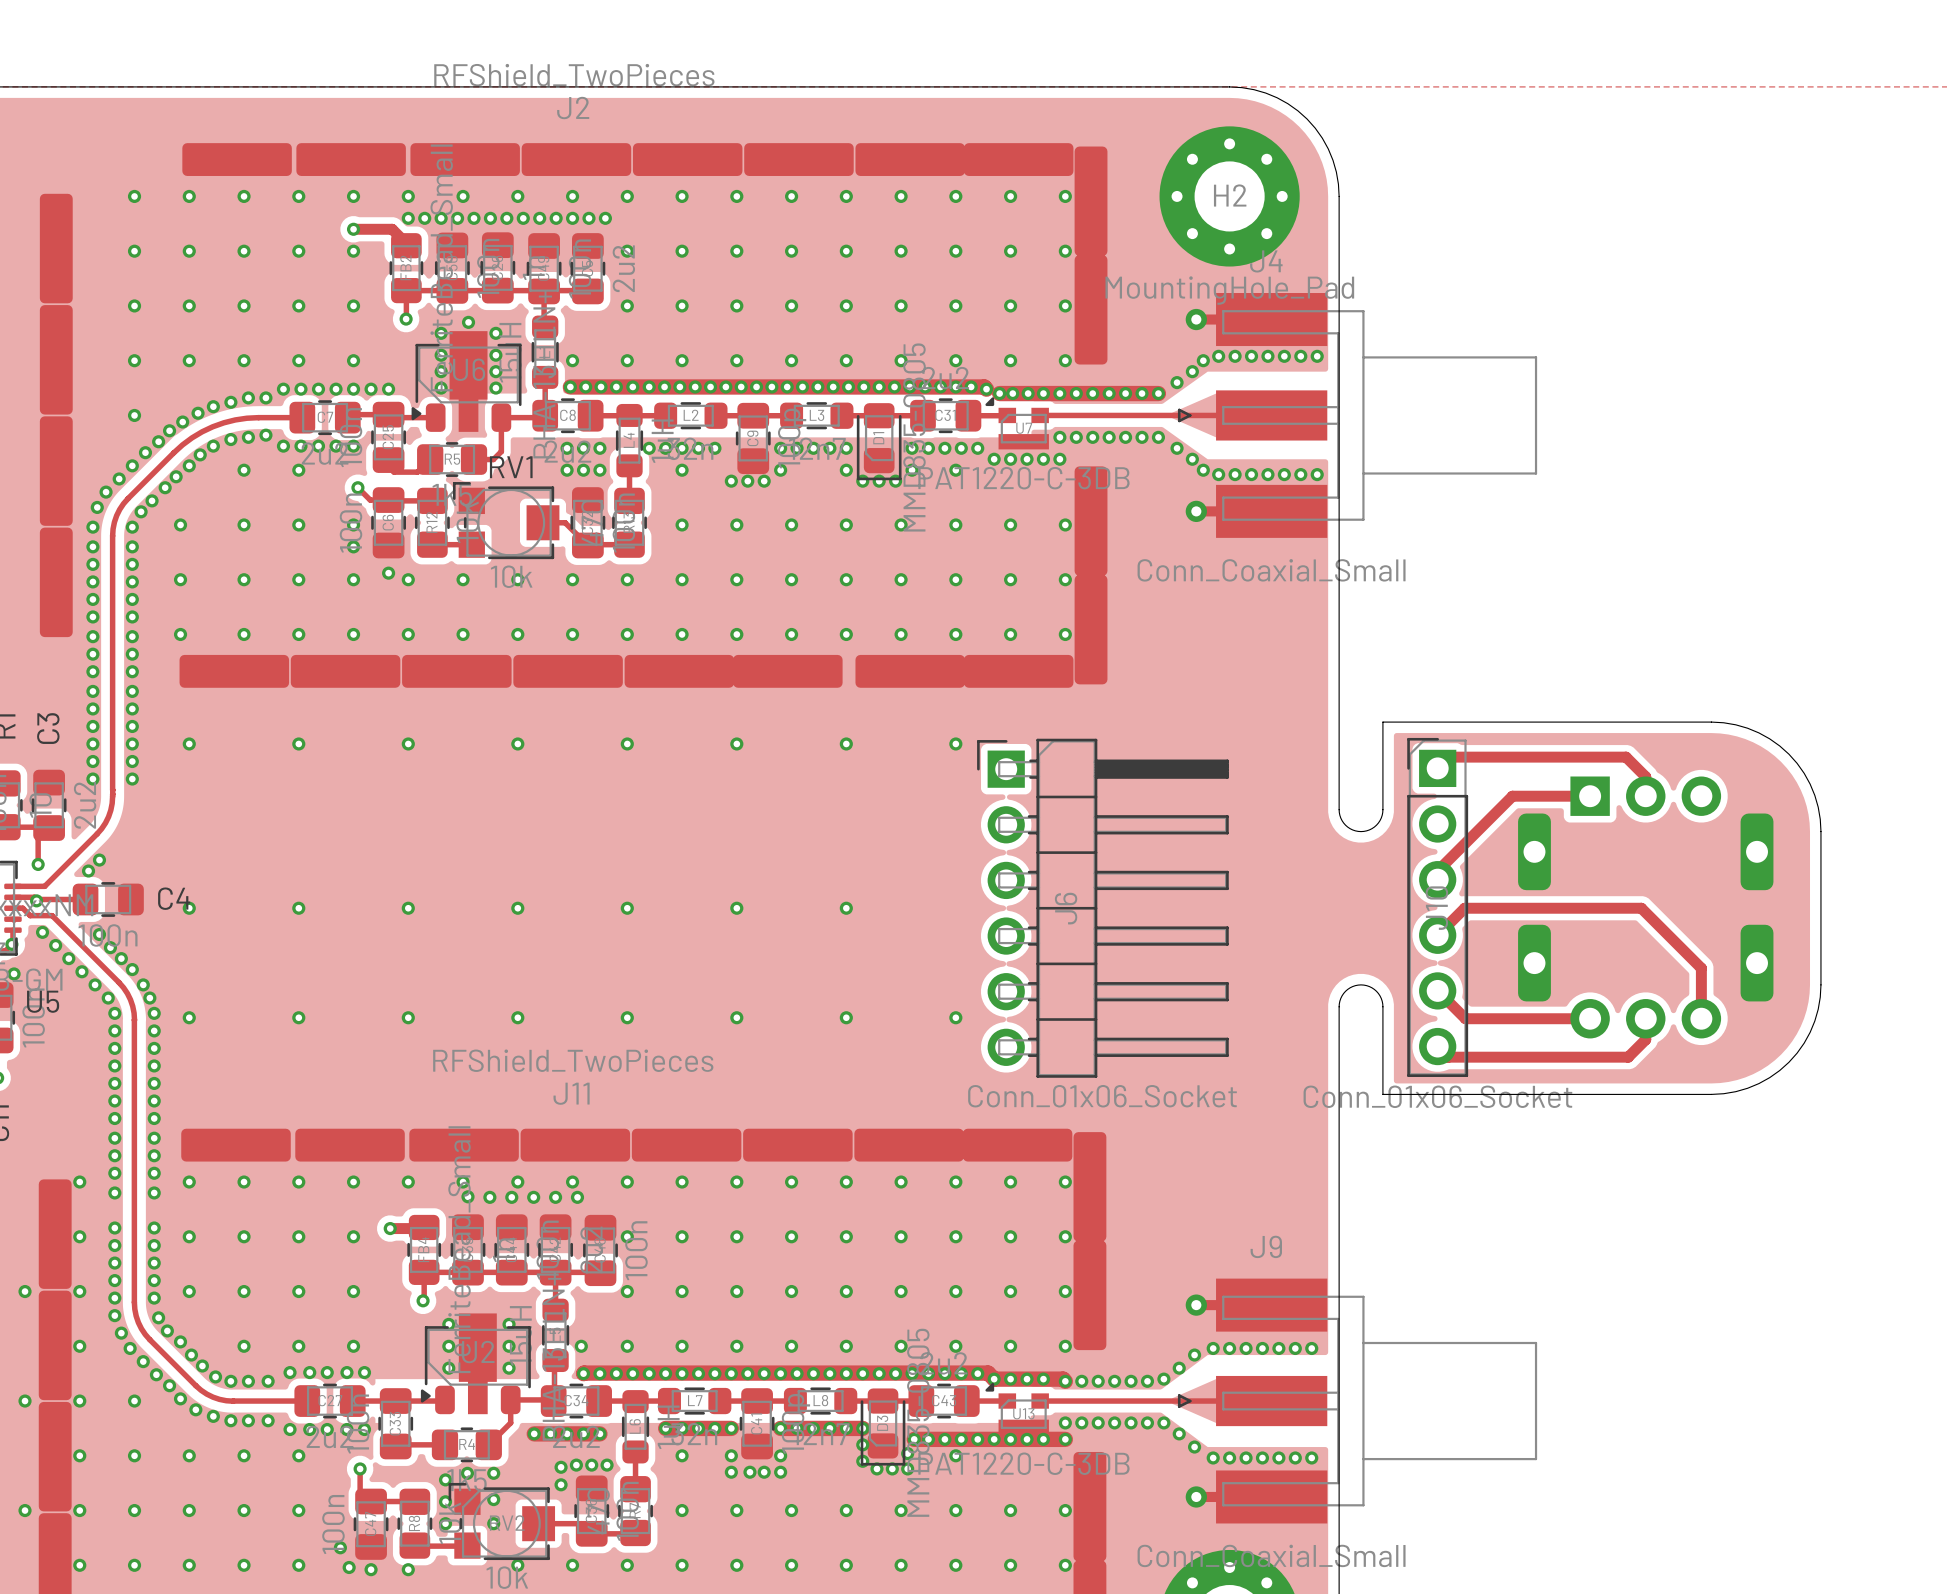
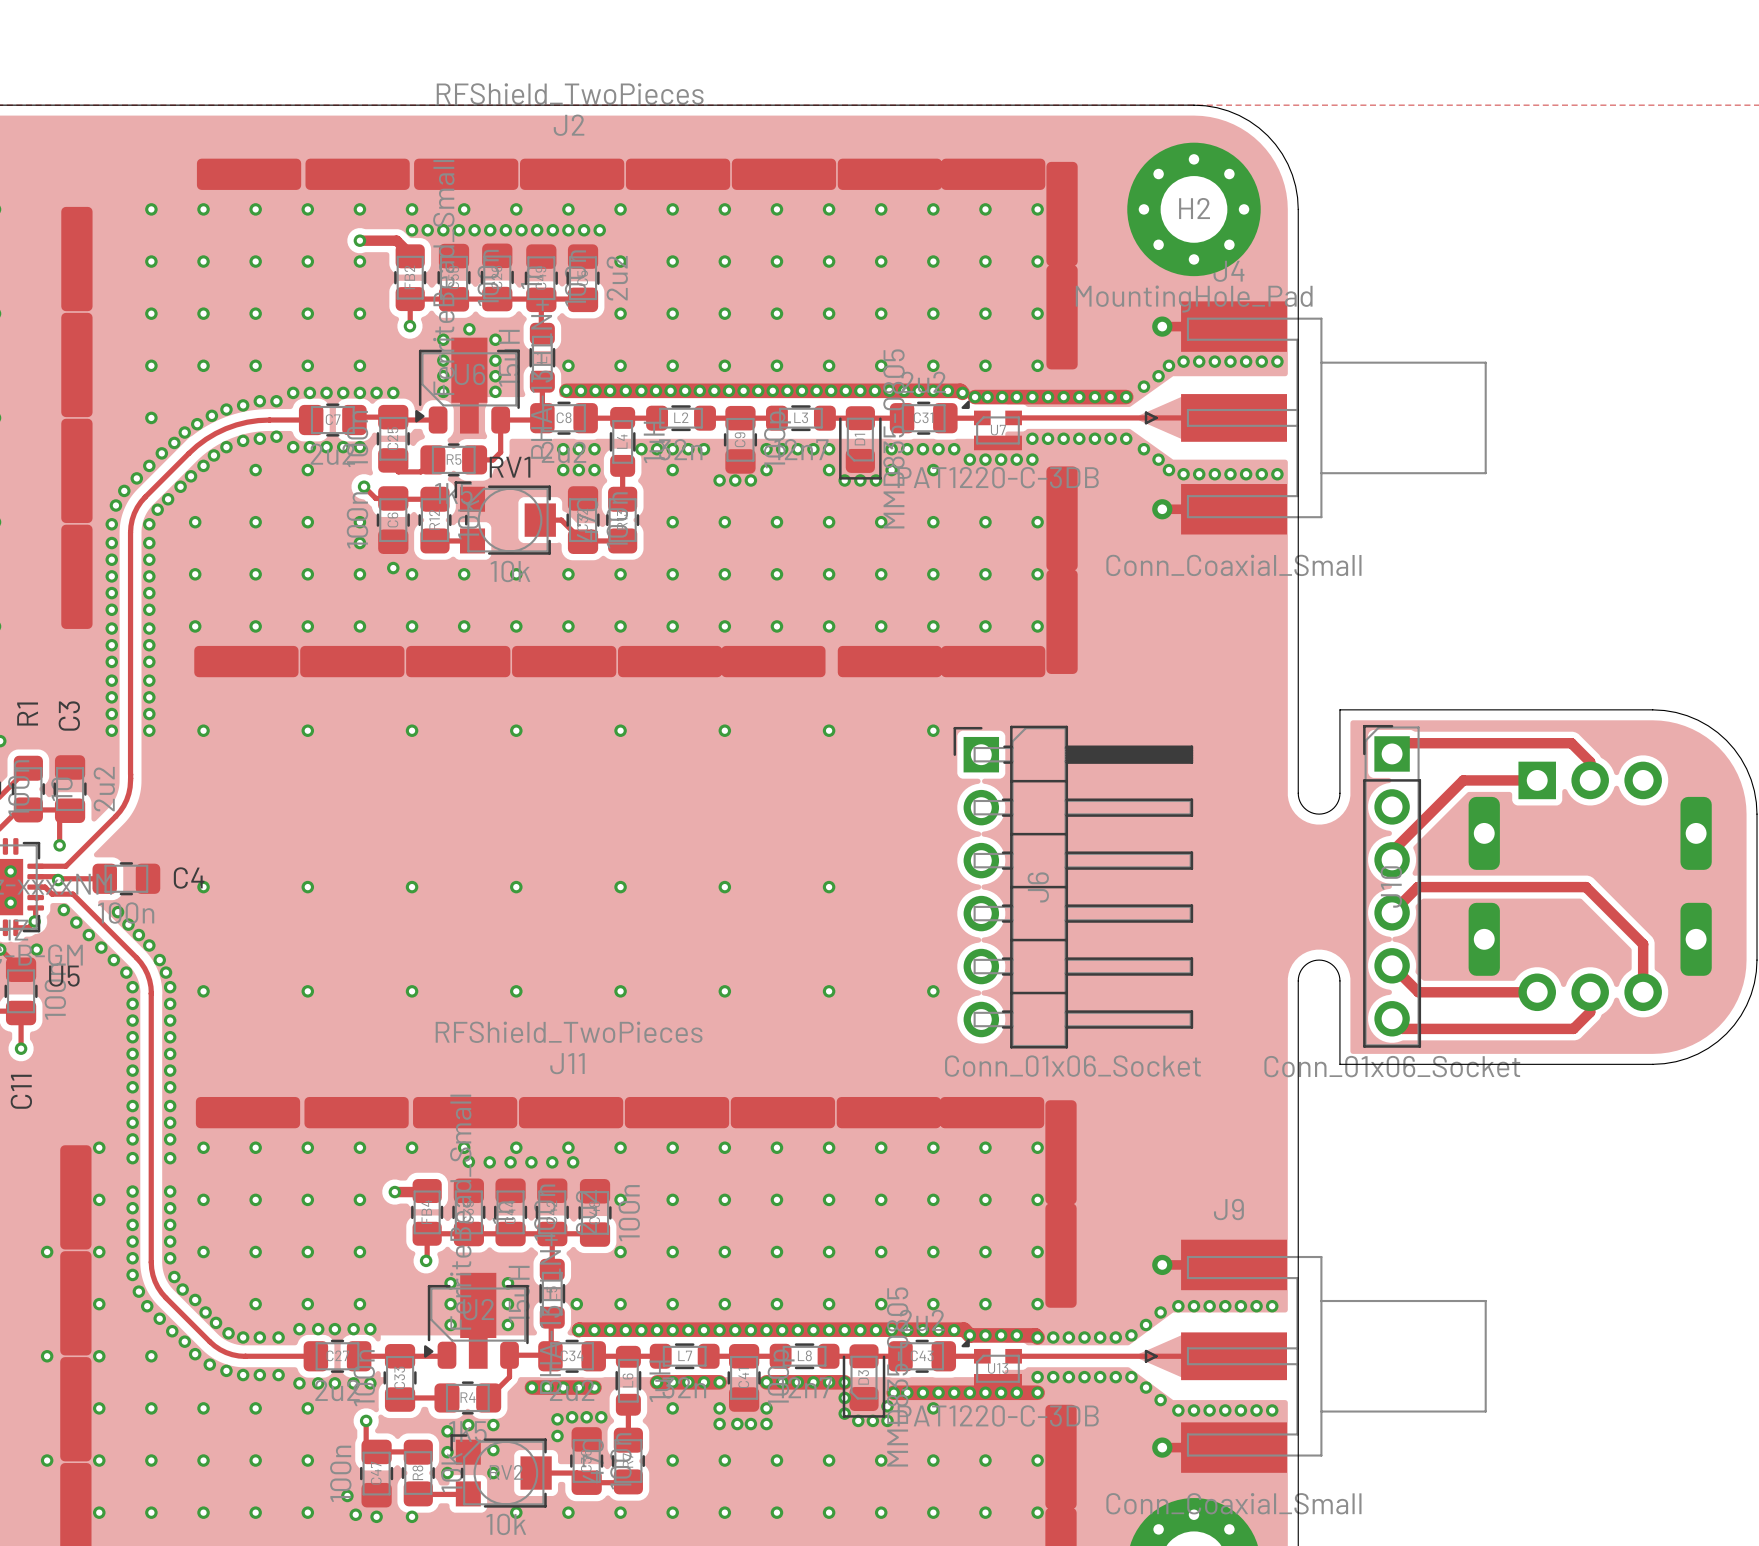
via: (92, 761) -> none
via: (132, 761) -> none
via: (92, 779) -> none
via: (132, 779) -> none
via: (99, 860) -> none
via: (88, 871) -> none

